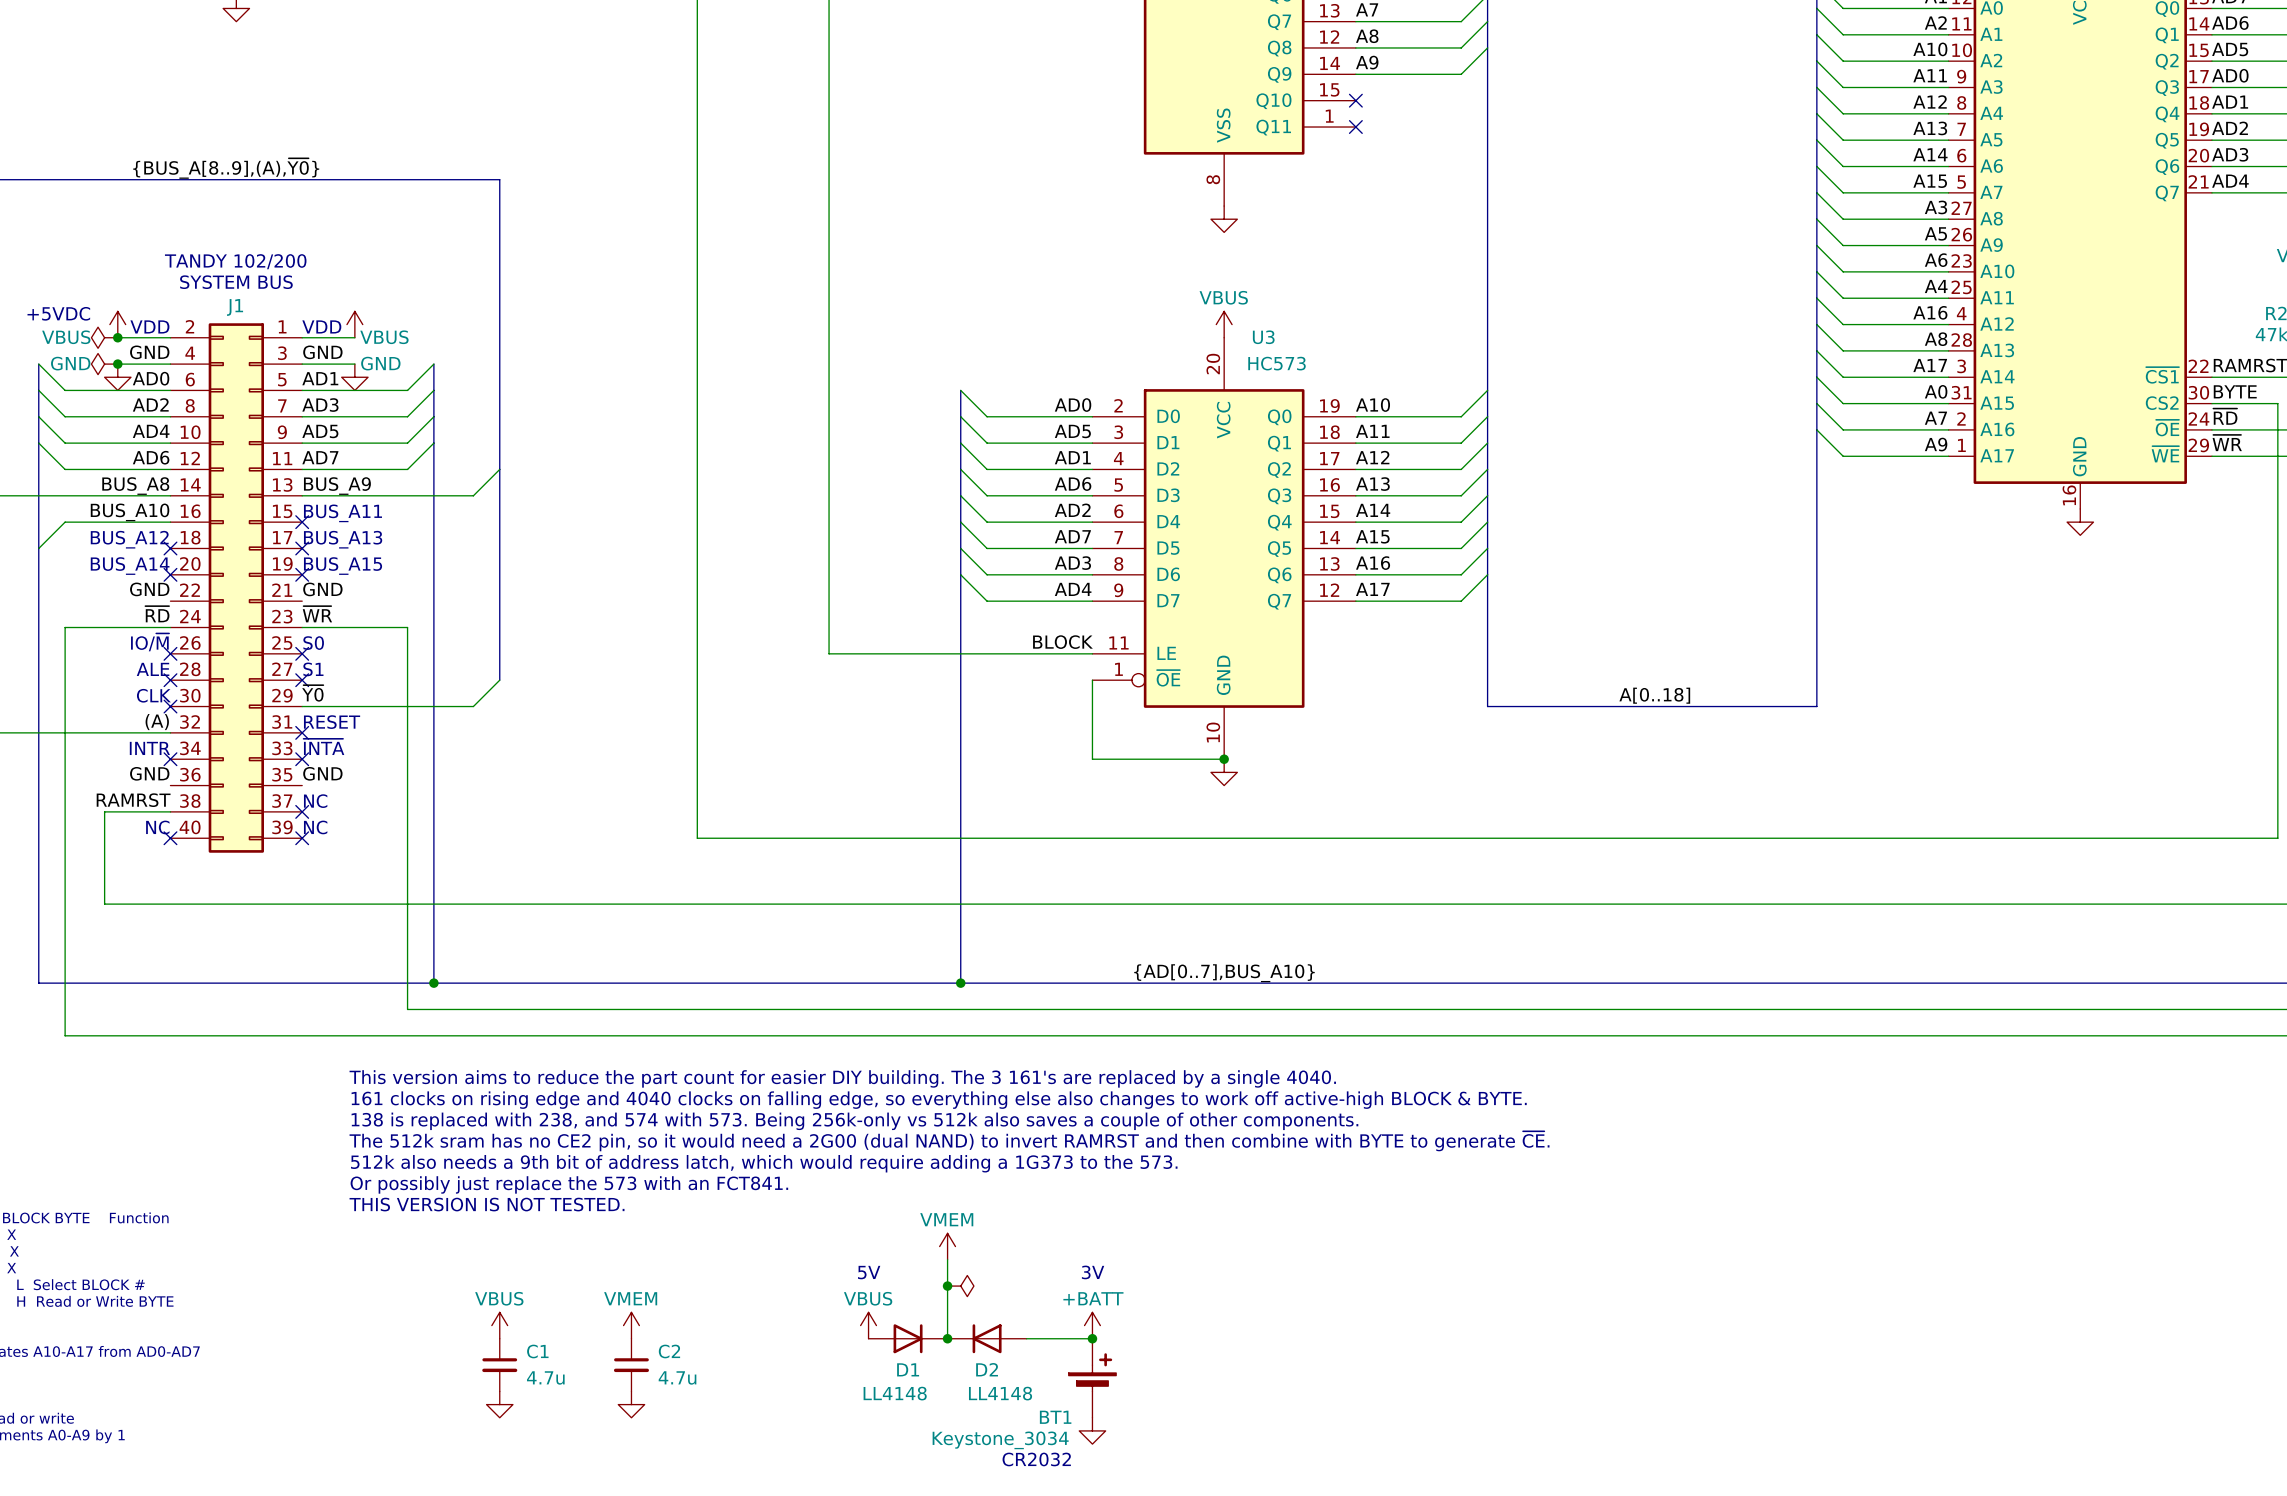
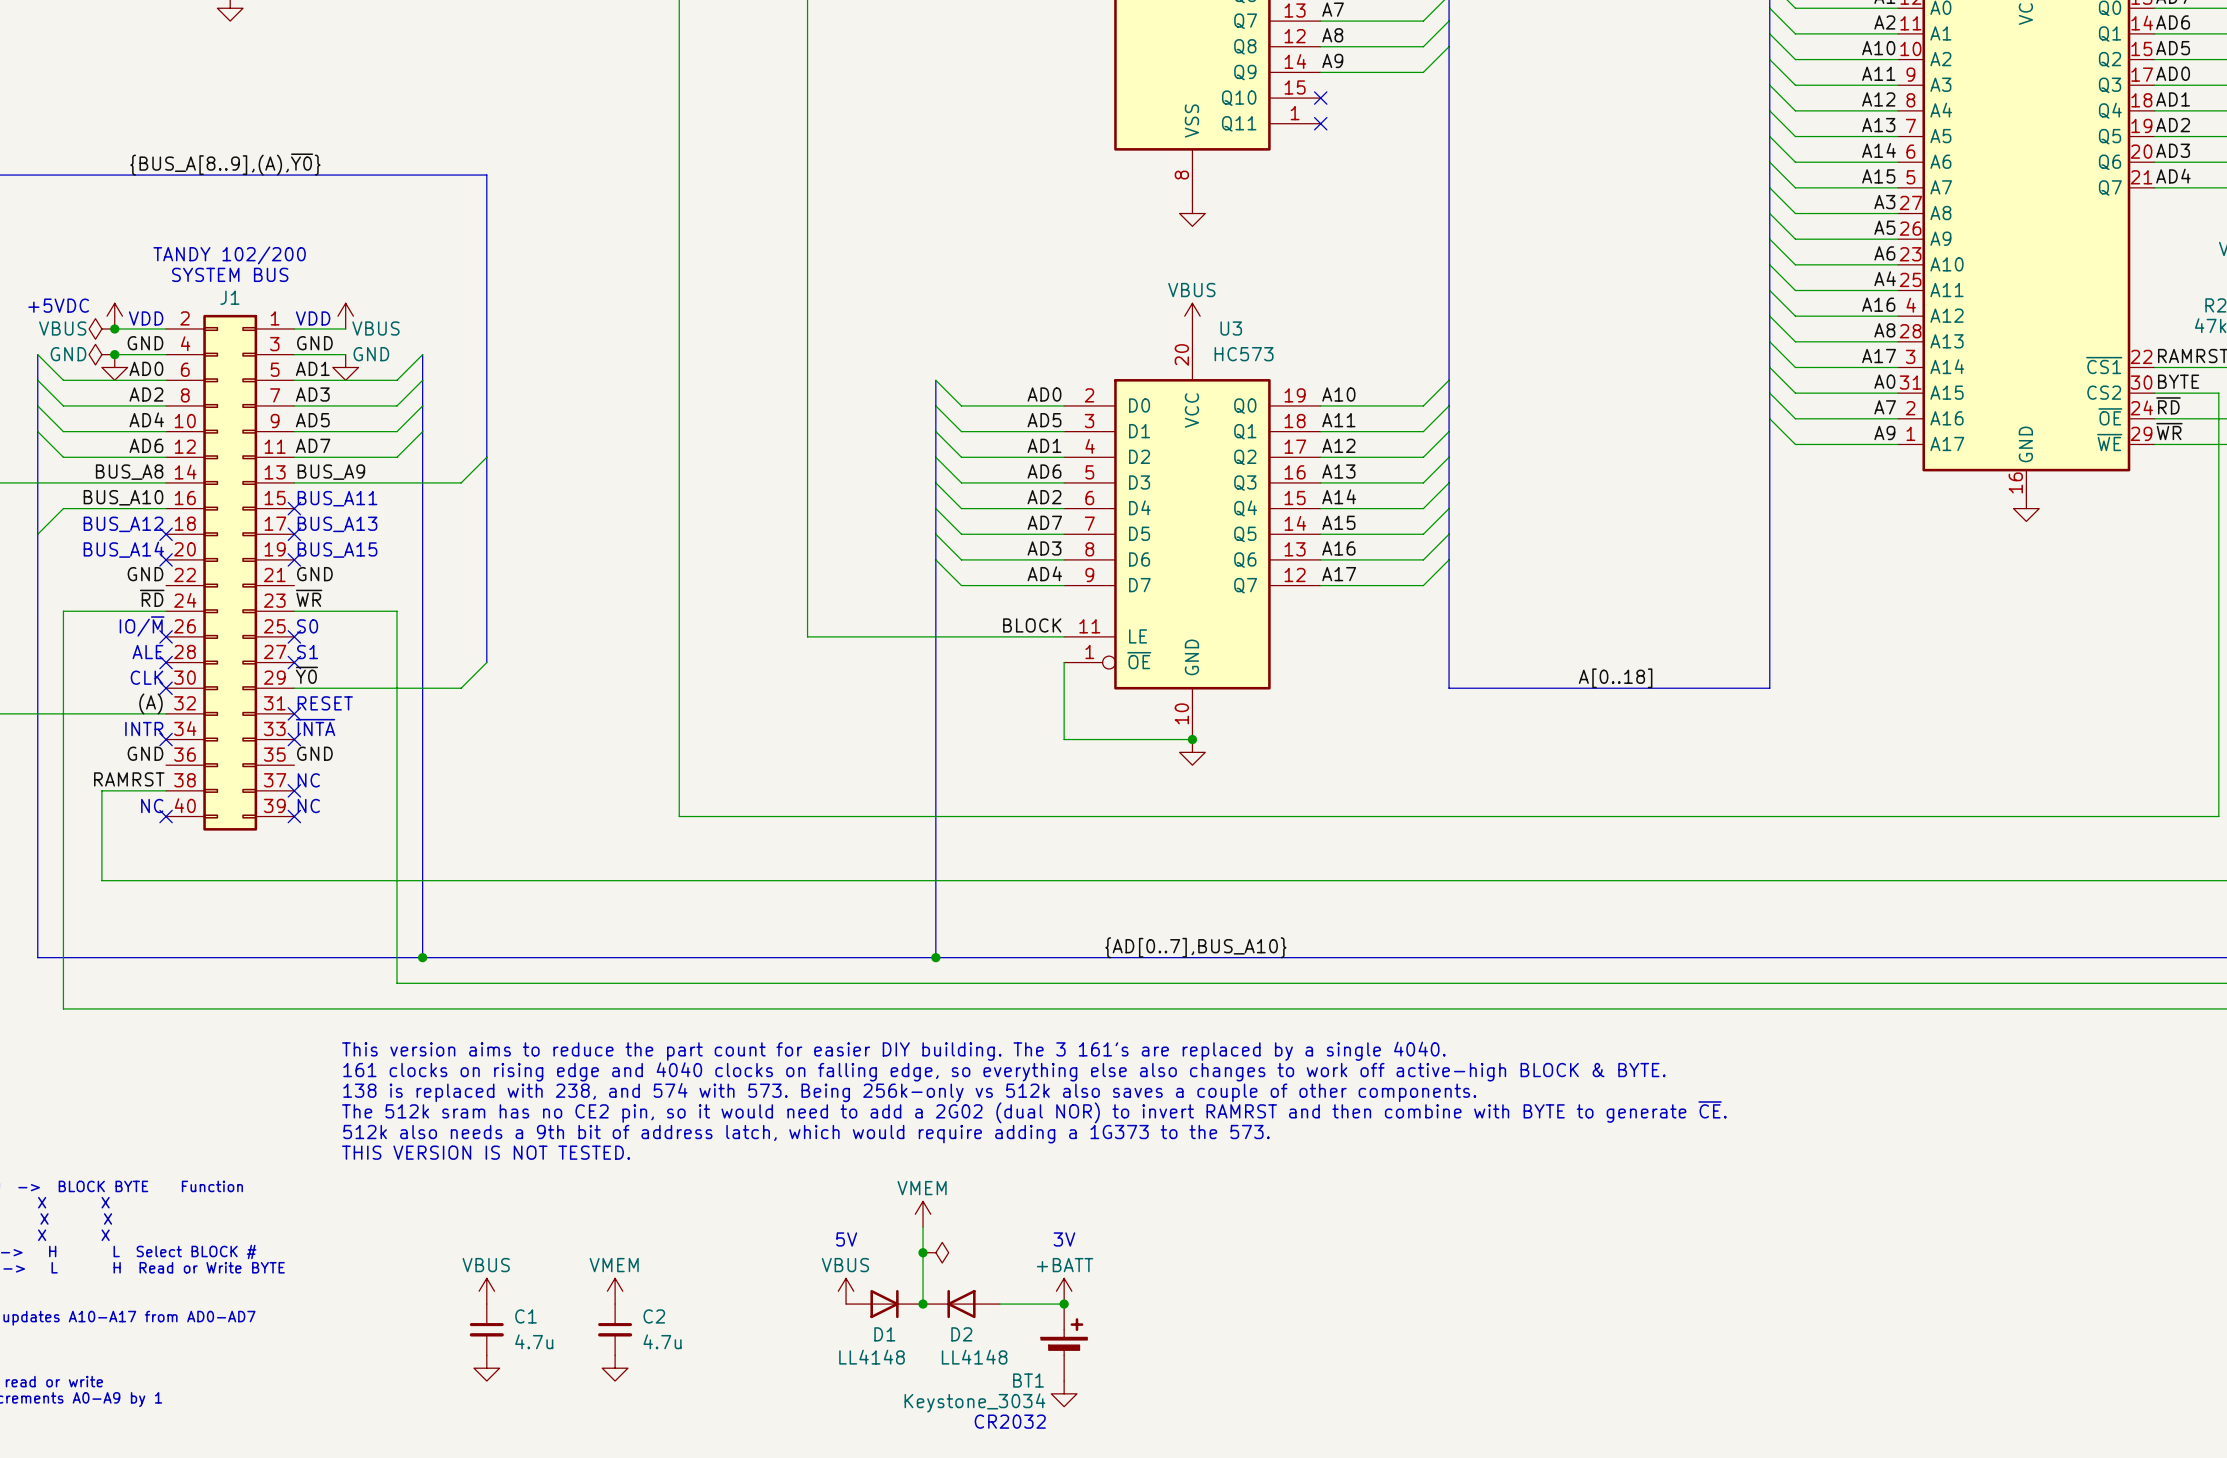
text: The 512k sram has no CE2 pin, so it would need a 2G00 (dual NAND) to invert RAMRST and then combine with BYTE to generate ~{CE}. (949, 1141) -> The 512k sram has no CE2 pin, so it would need to add a 2G02 (dual NOR) to invert RAMRST and then combine with BYTE to generate ~{CE}. (1034, 1112)
text: Or possibly just replace the 573 with an FCT841. (569, 1184) -> THIS VERSION IS NOT TESTED. (486, 1152)
text: THIS VERSION IS NOT TESTED. (487, 1204) -> none

